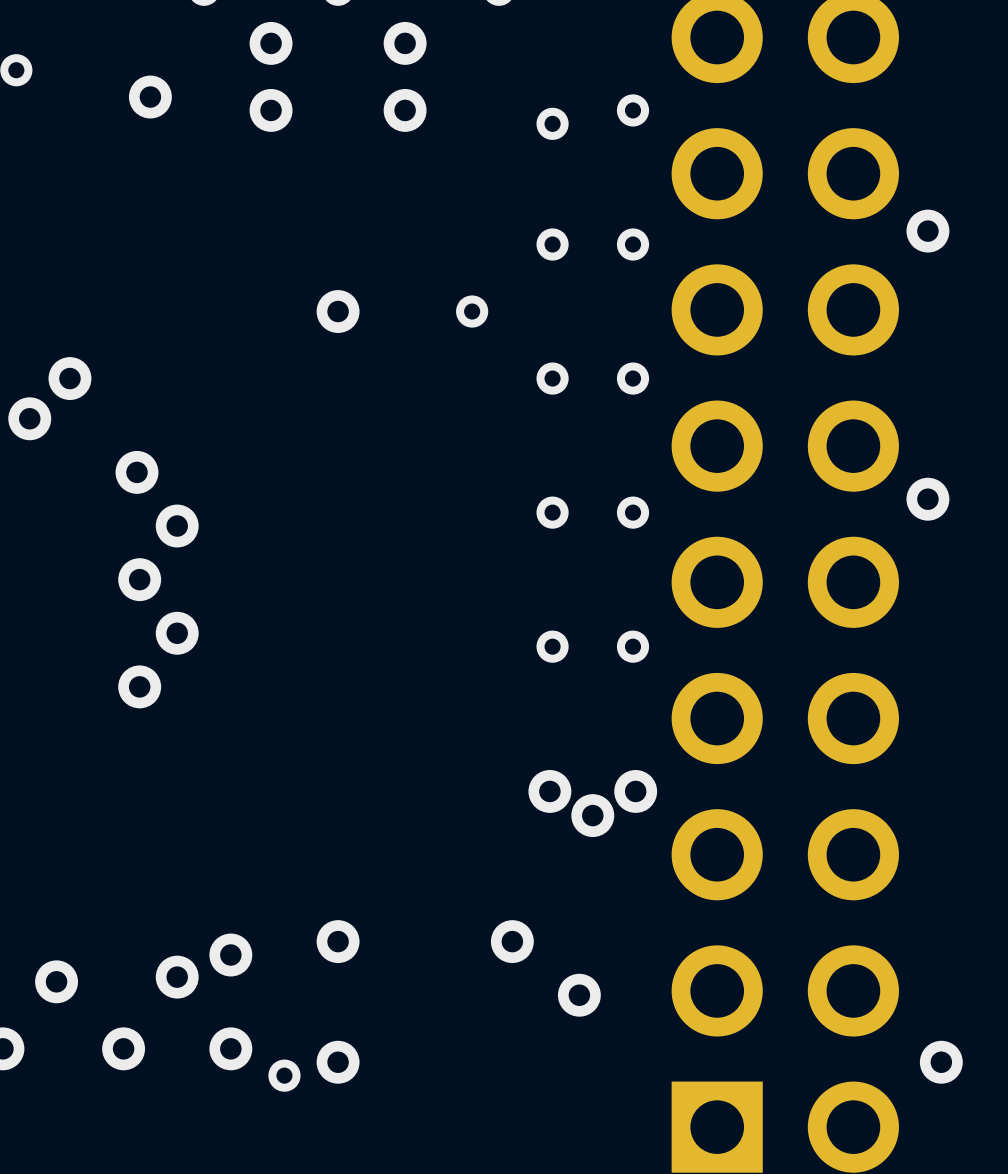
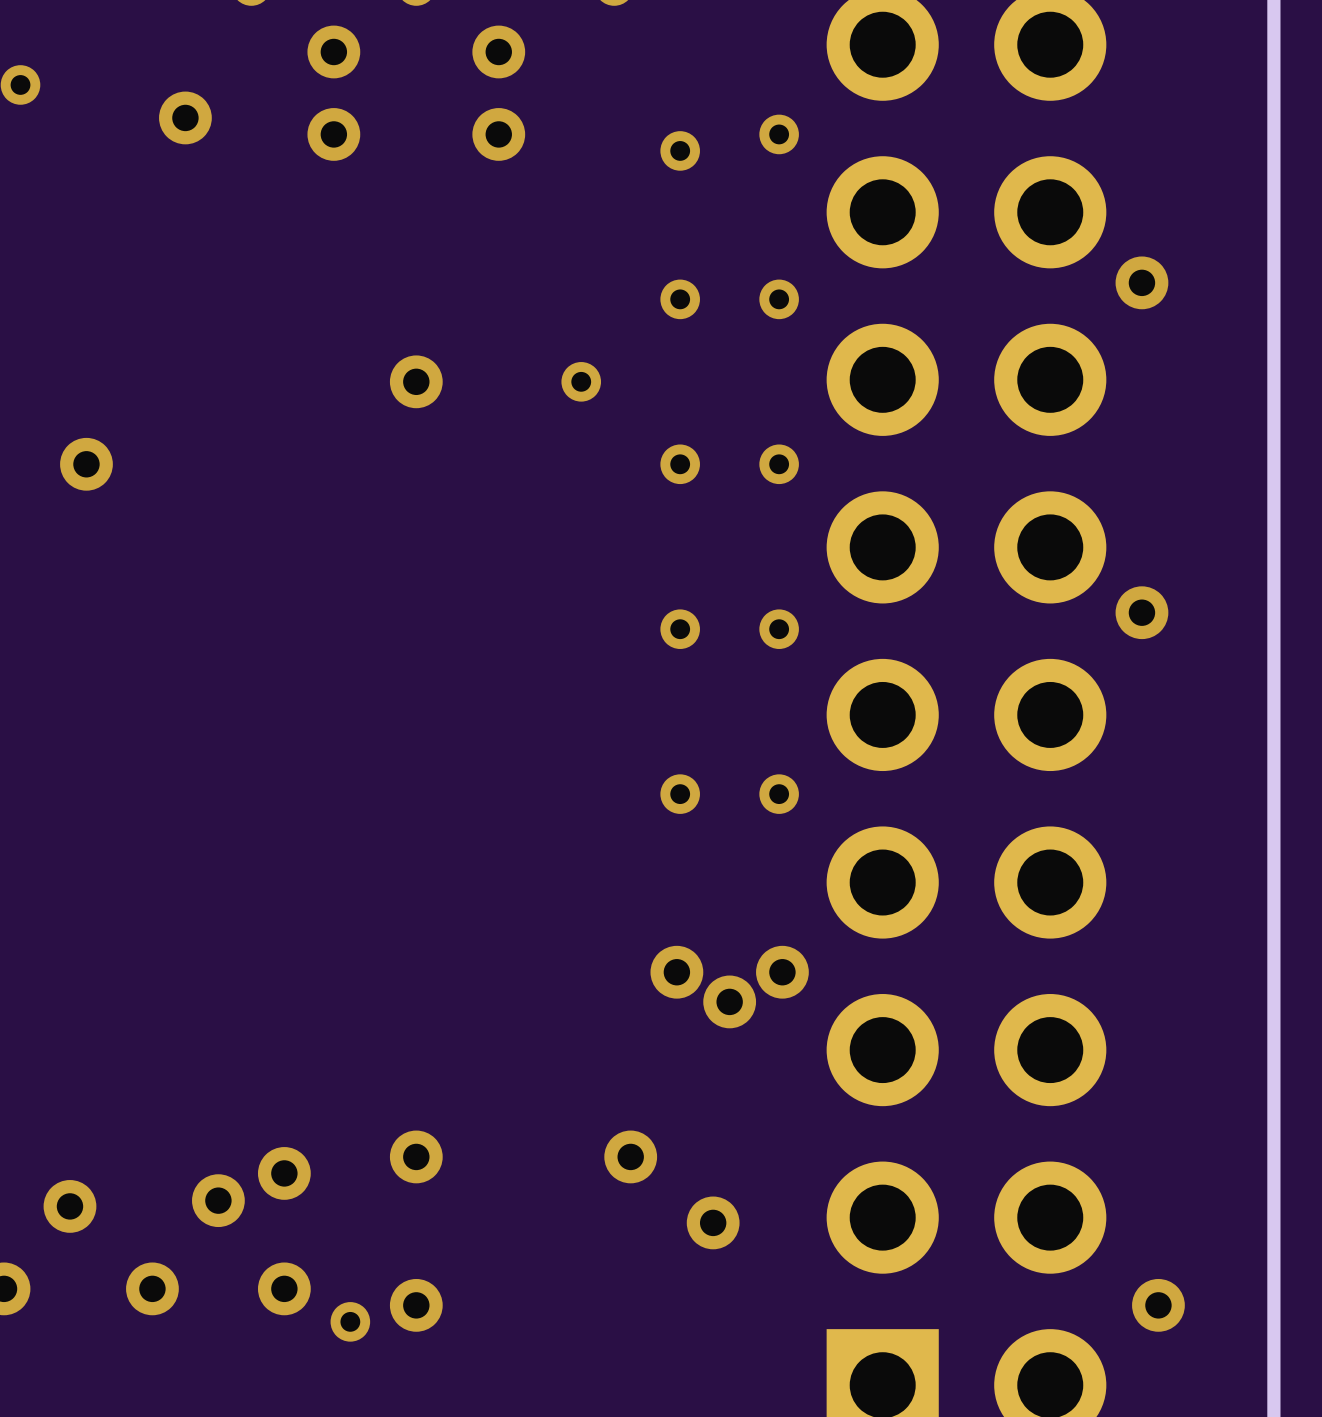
via: (29, 418) -> none
via: (136, 472) -> none
via: (177, 526) -> none
via: (139, 579) -> none
via: (177, 633) -> none
via: (139, 686) -> none

